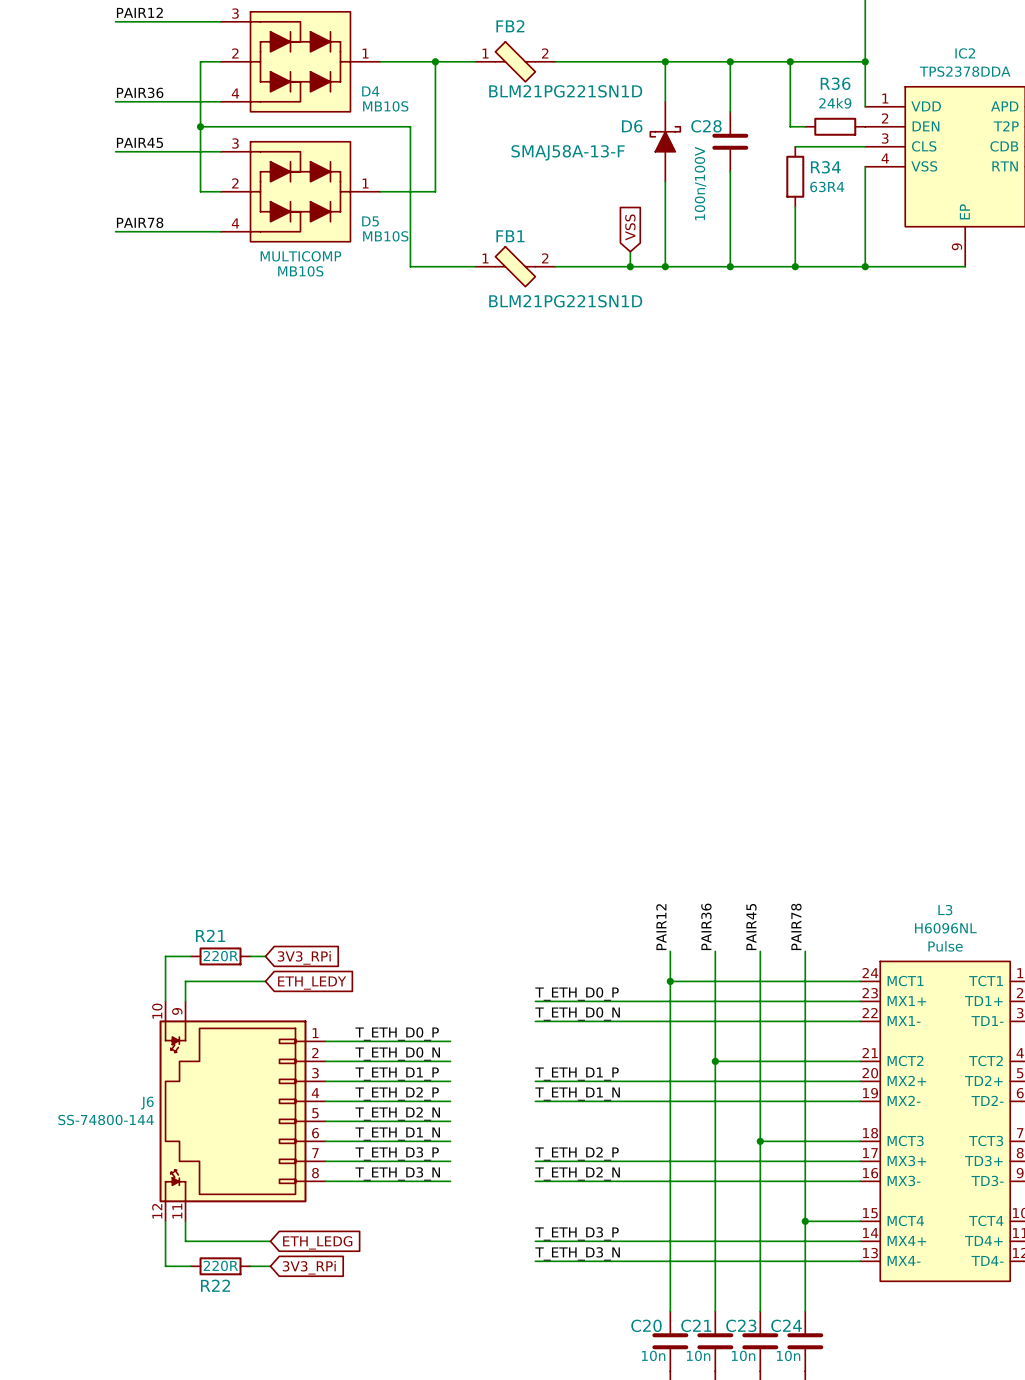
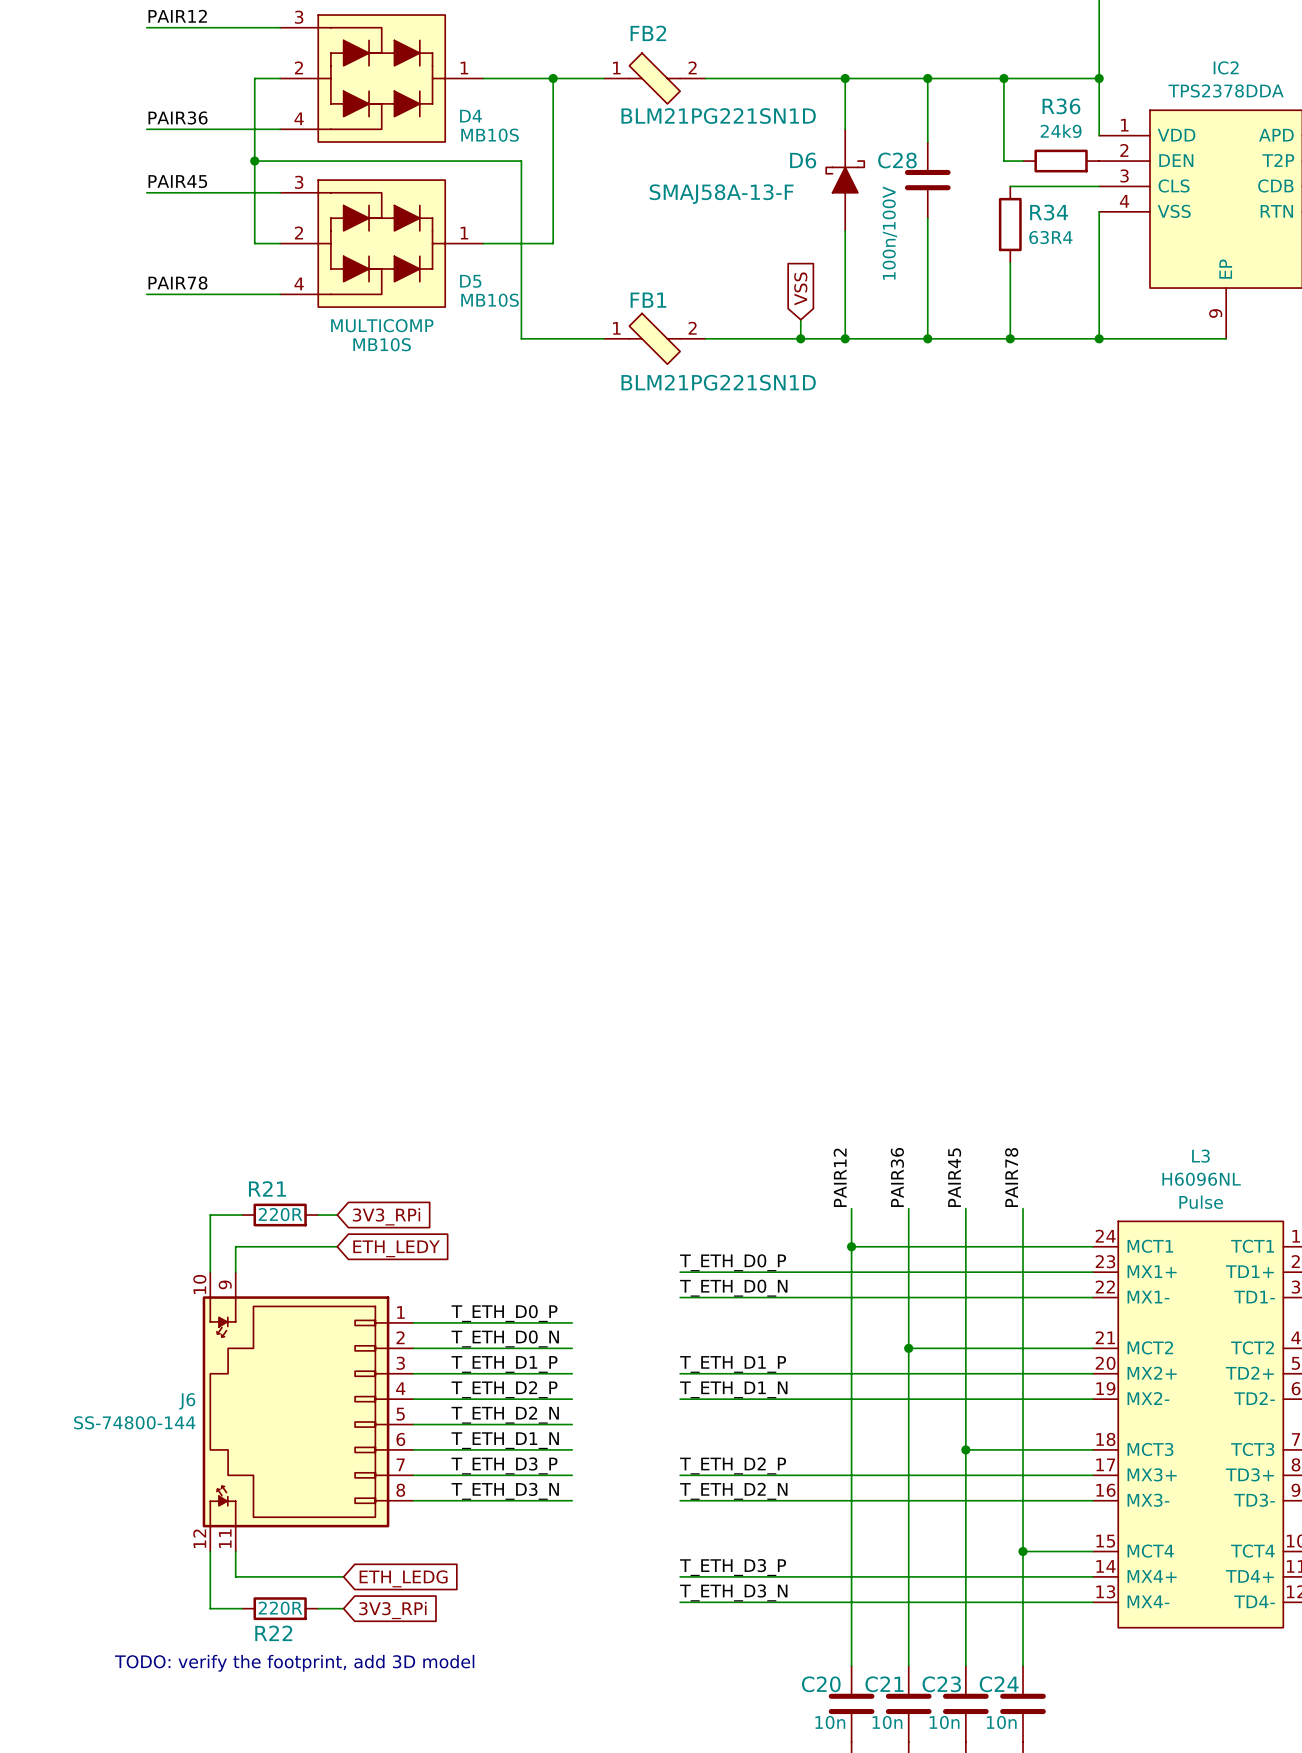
text: none -> TODO: verify the footprint, add 3D model (294, 1663)

